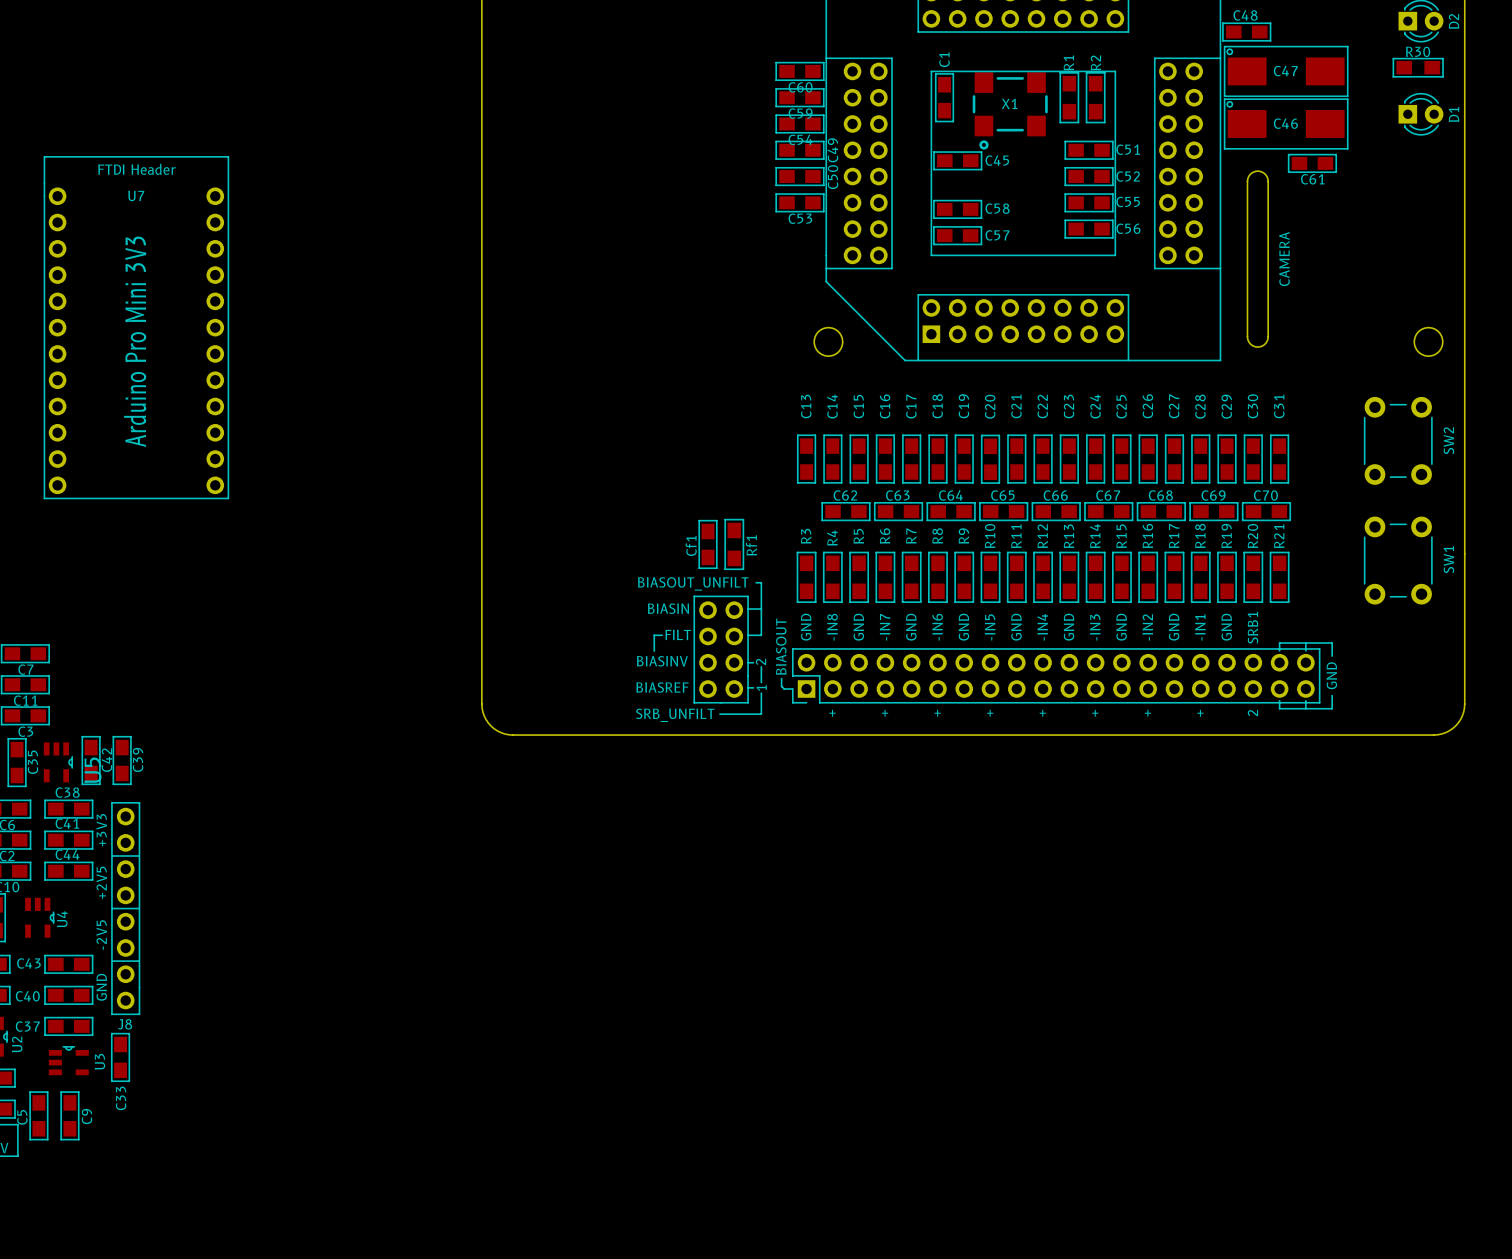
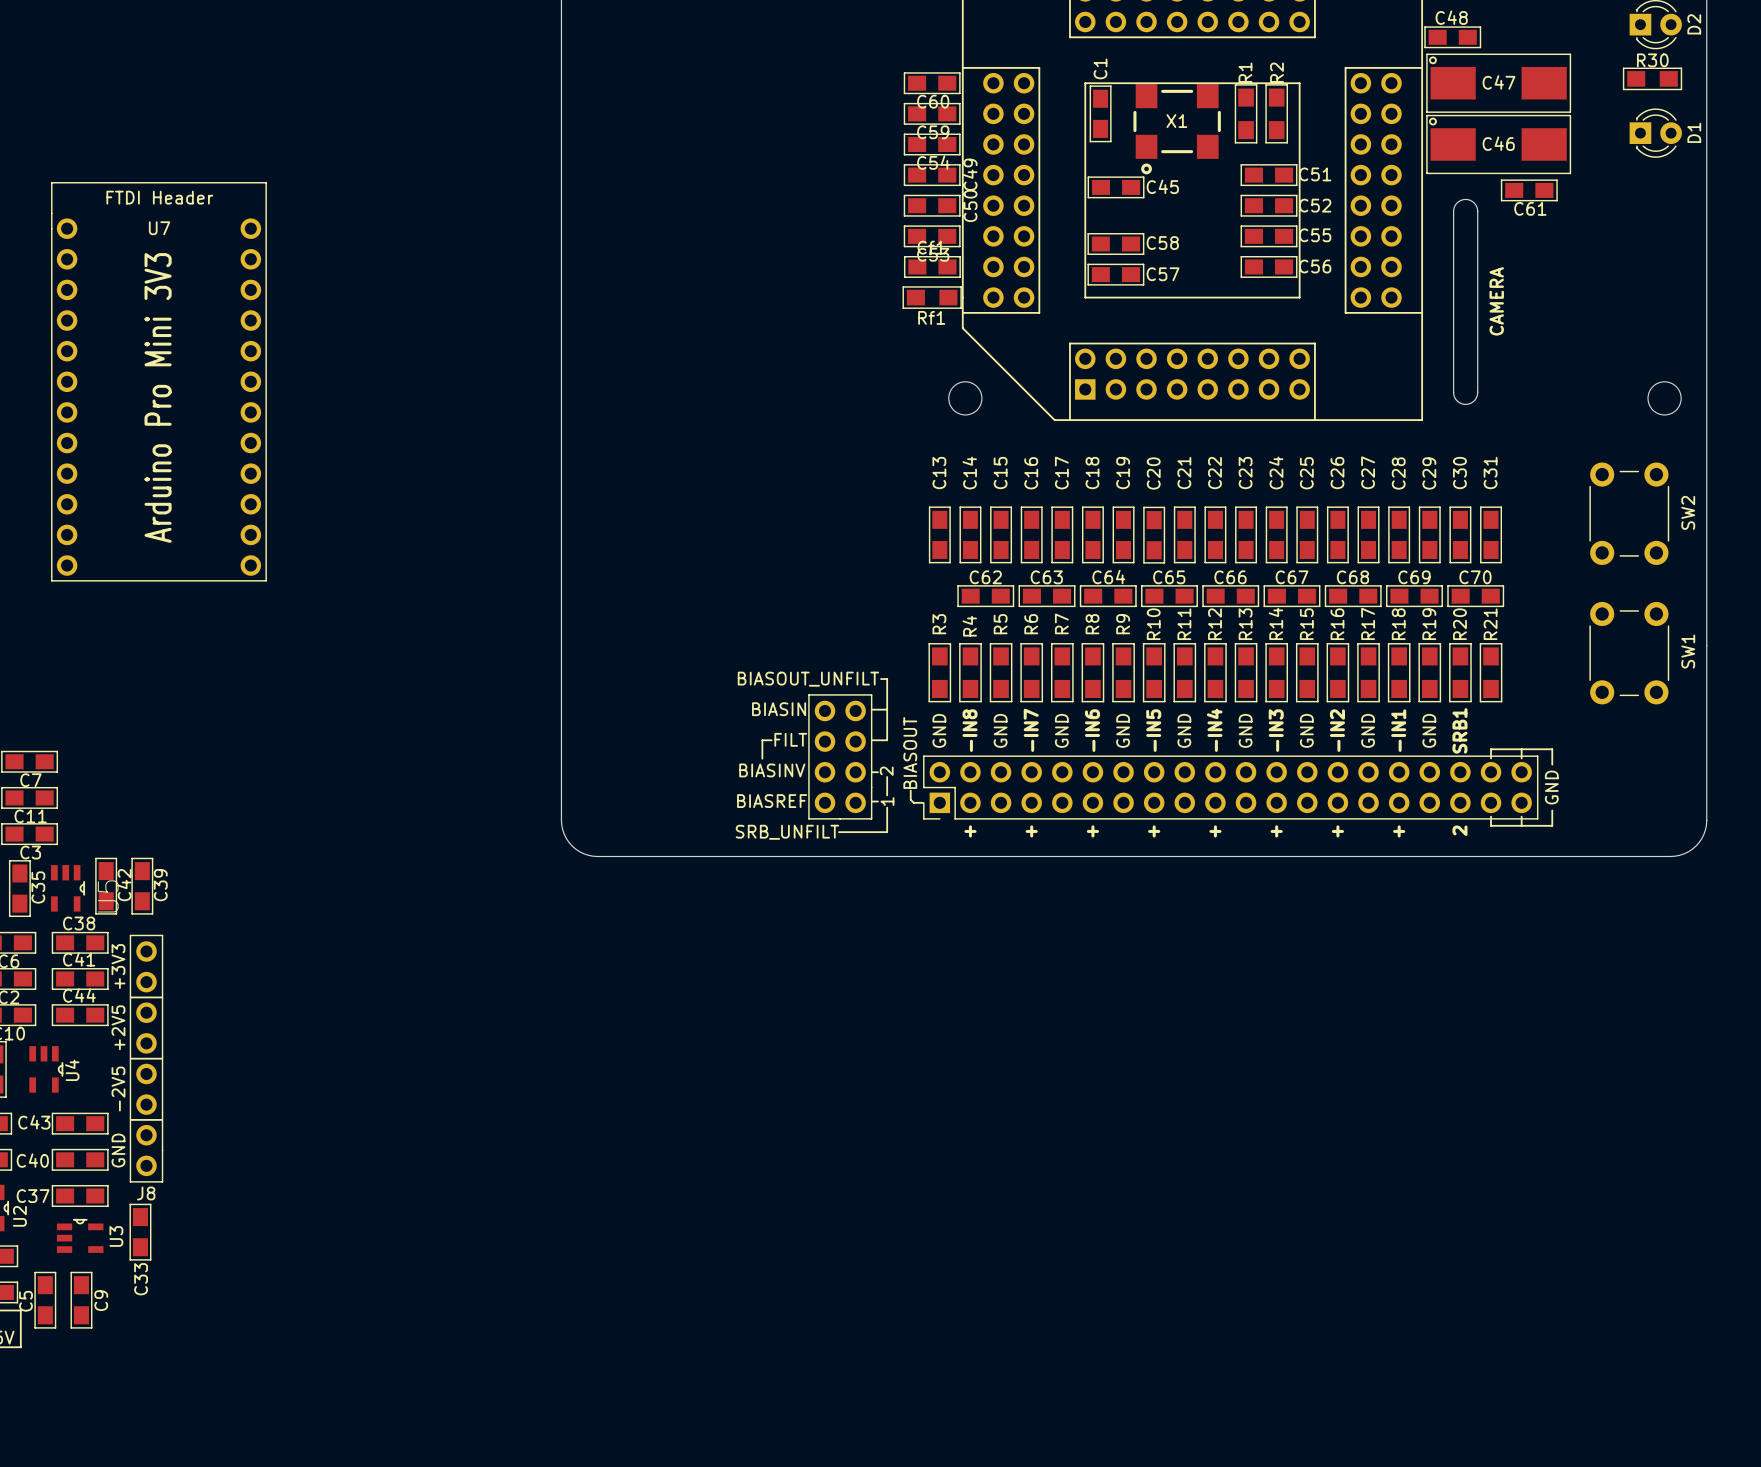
Cf1 rotation: 0° (708, 544) -> 90° clockwise (932, 266)
Cf1 position: (708, 544) -> (932, 266)
Rf1 rotation: 0° (734, 544) -> 90° clockwise (932, 297)
Rf1 position: (734, 544) -> (932, 297)

